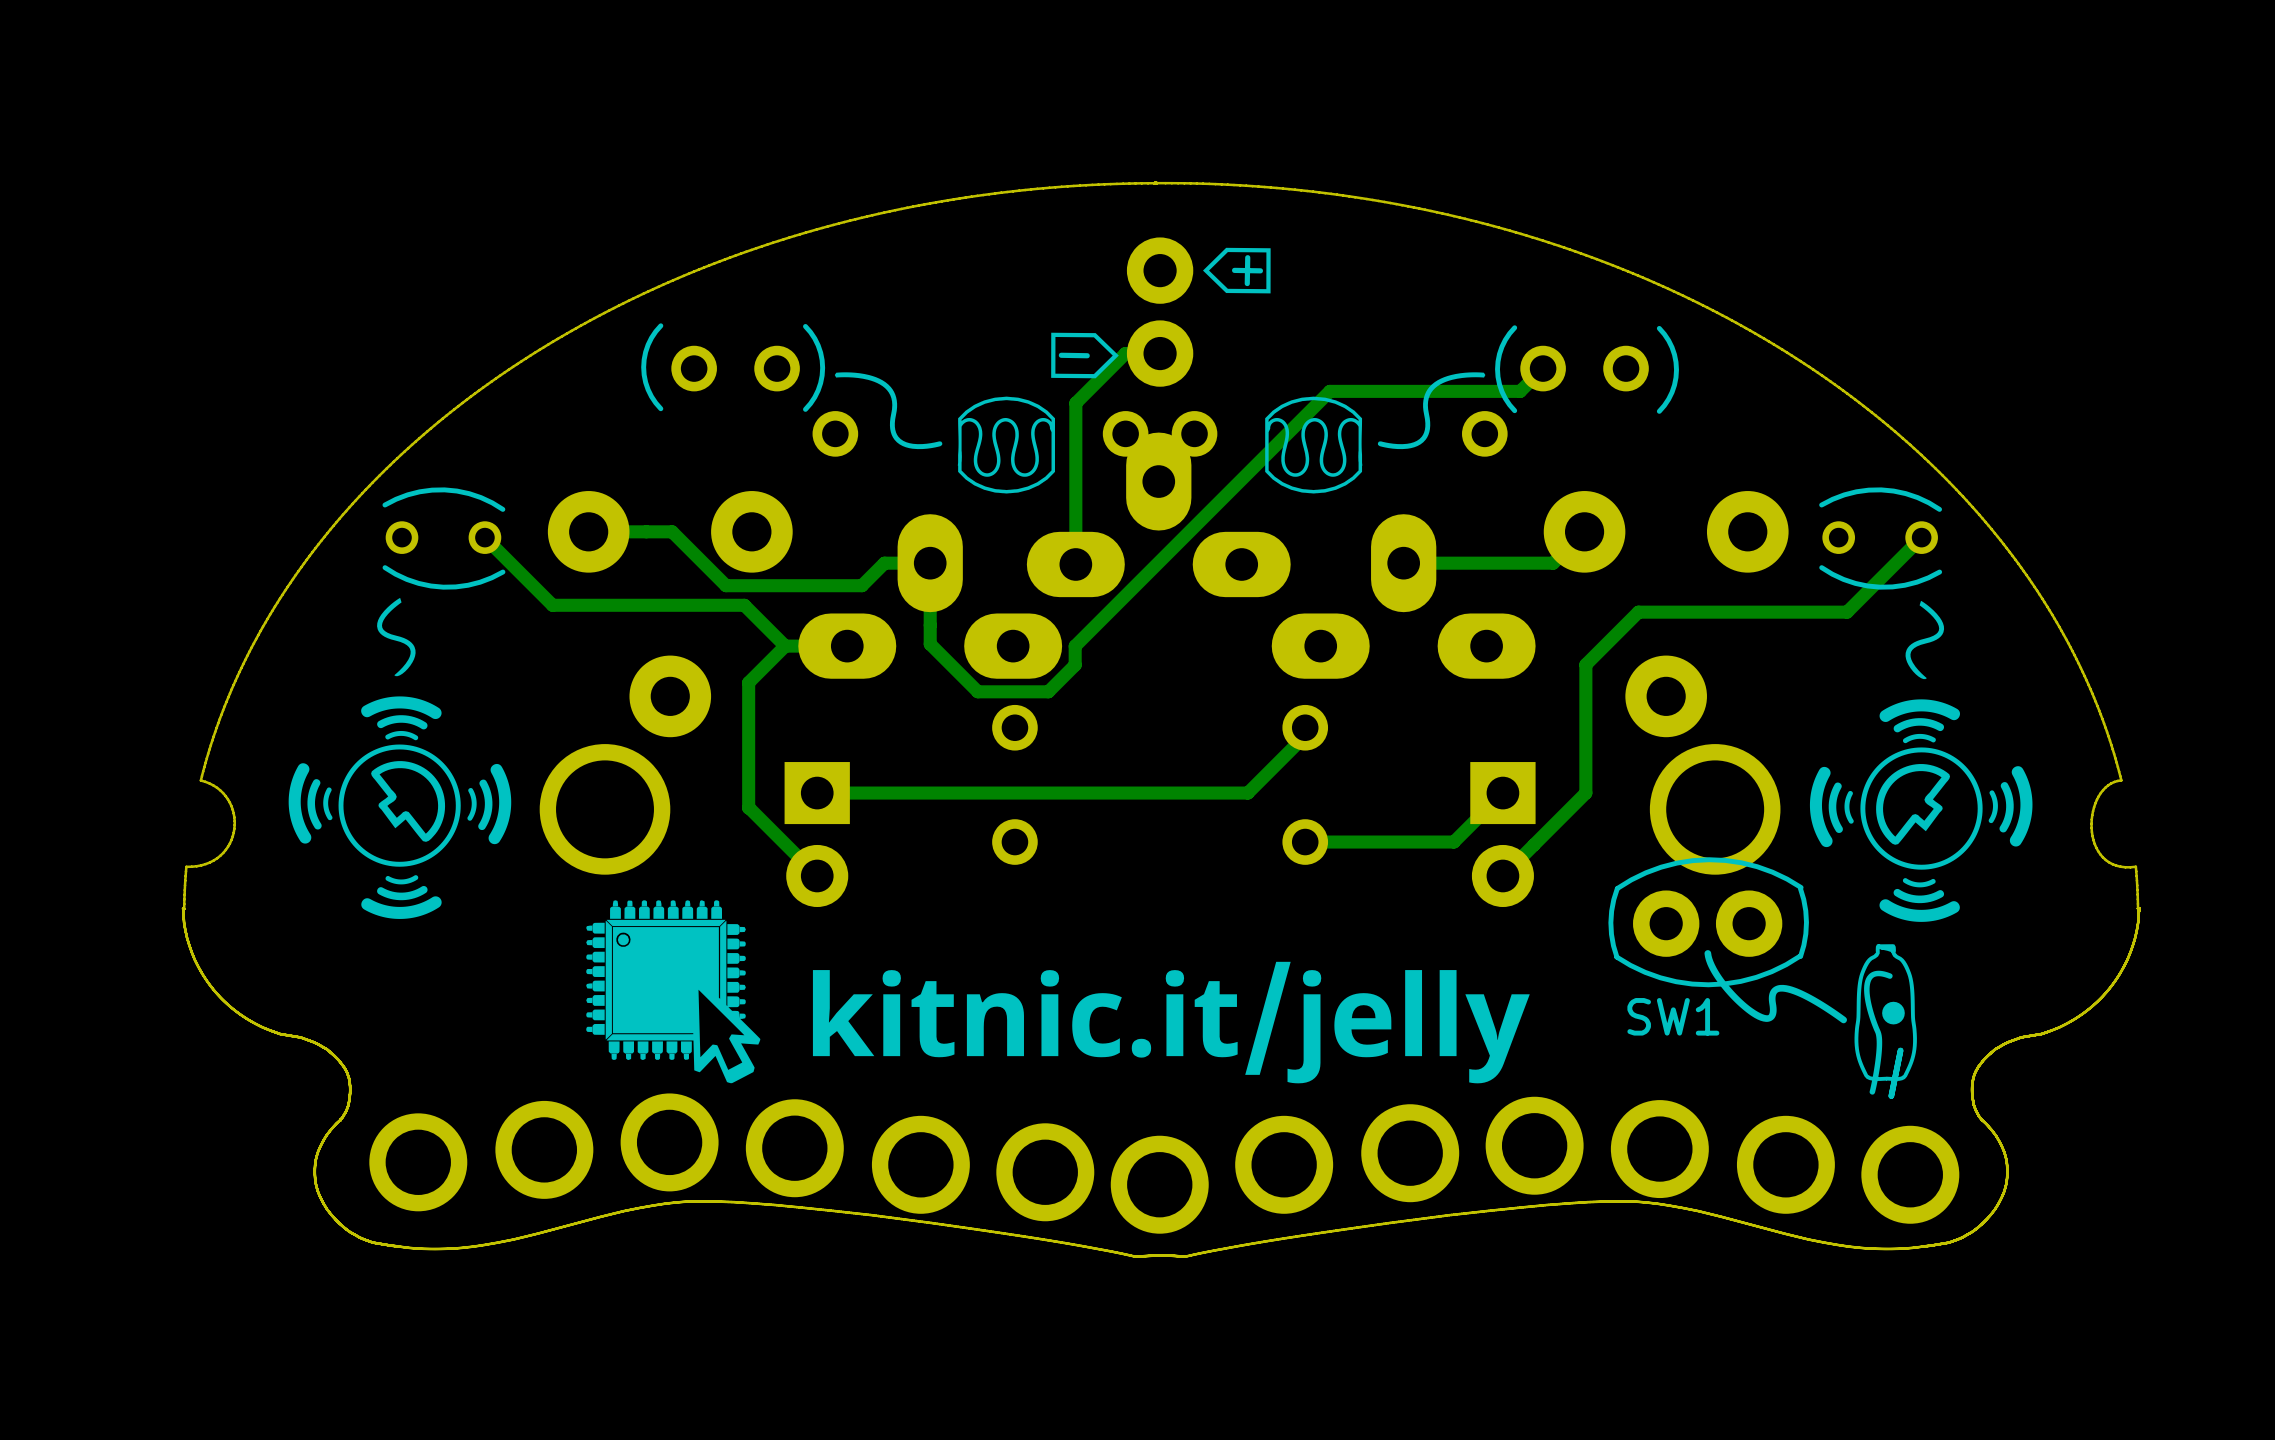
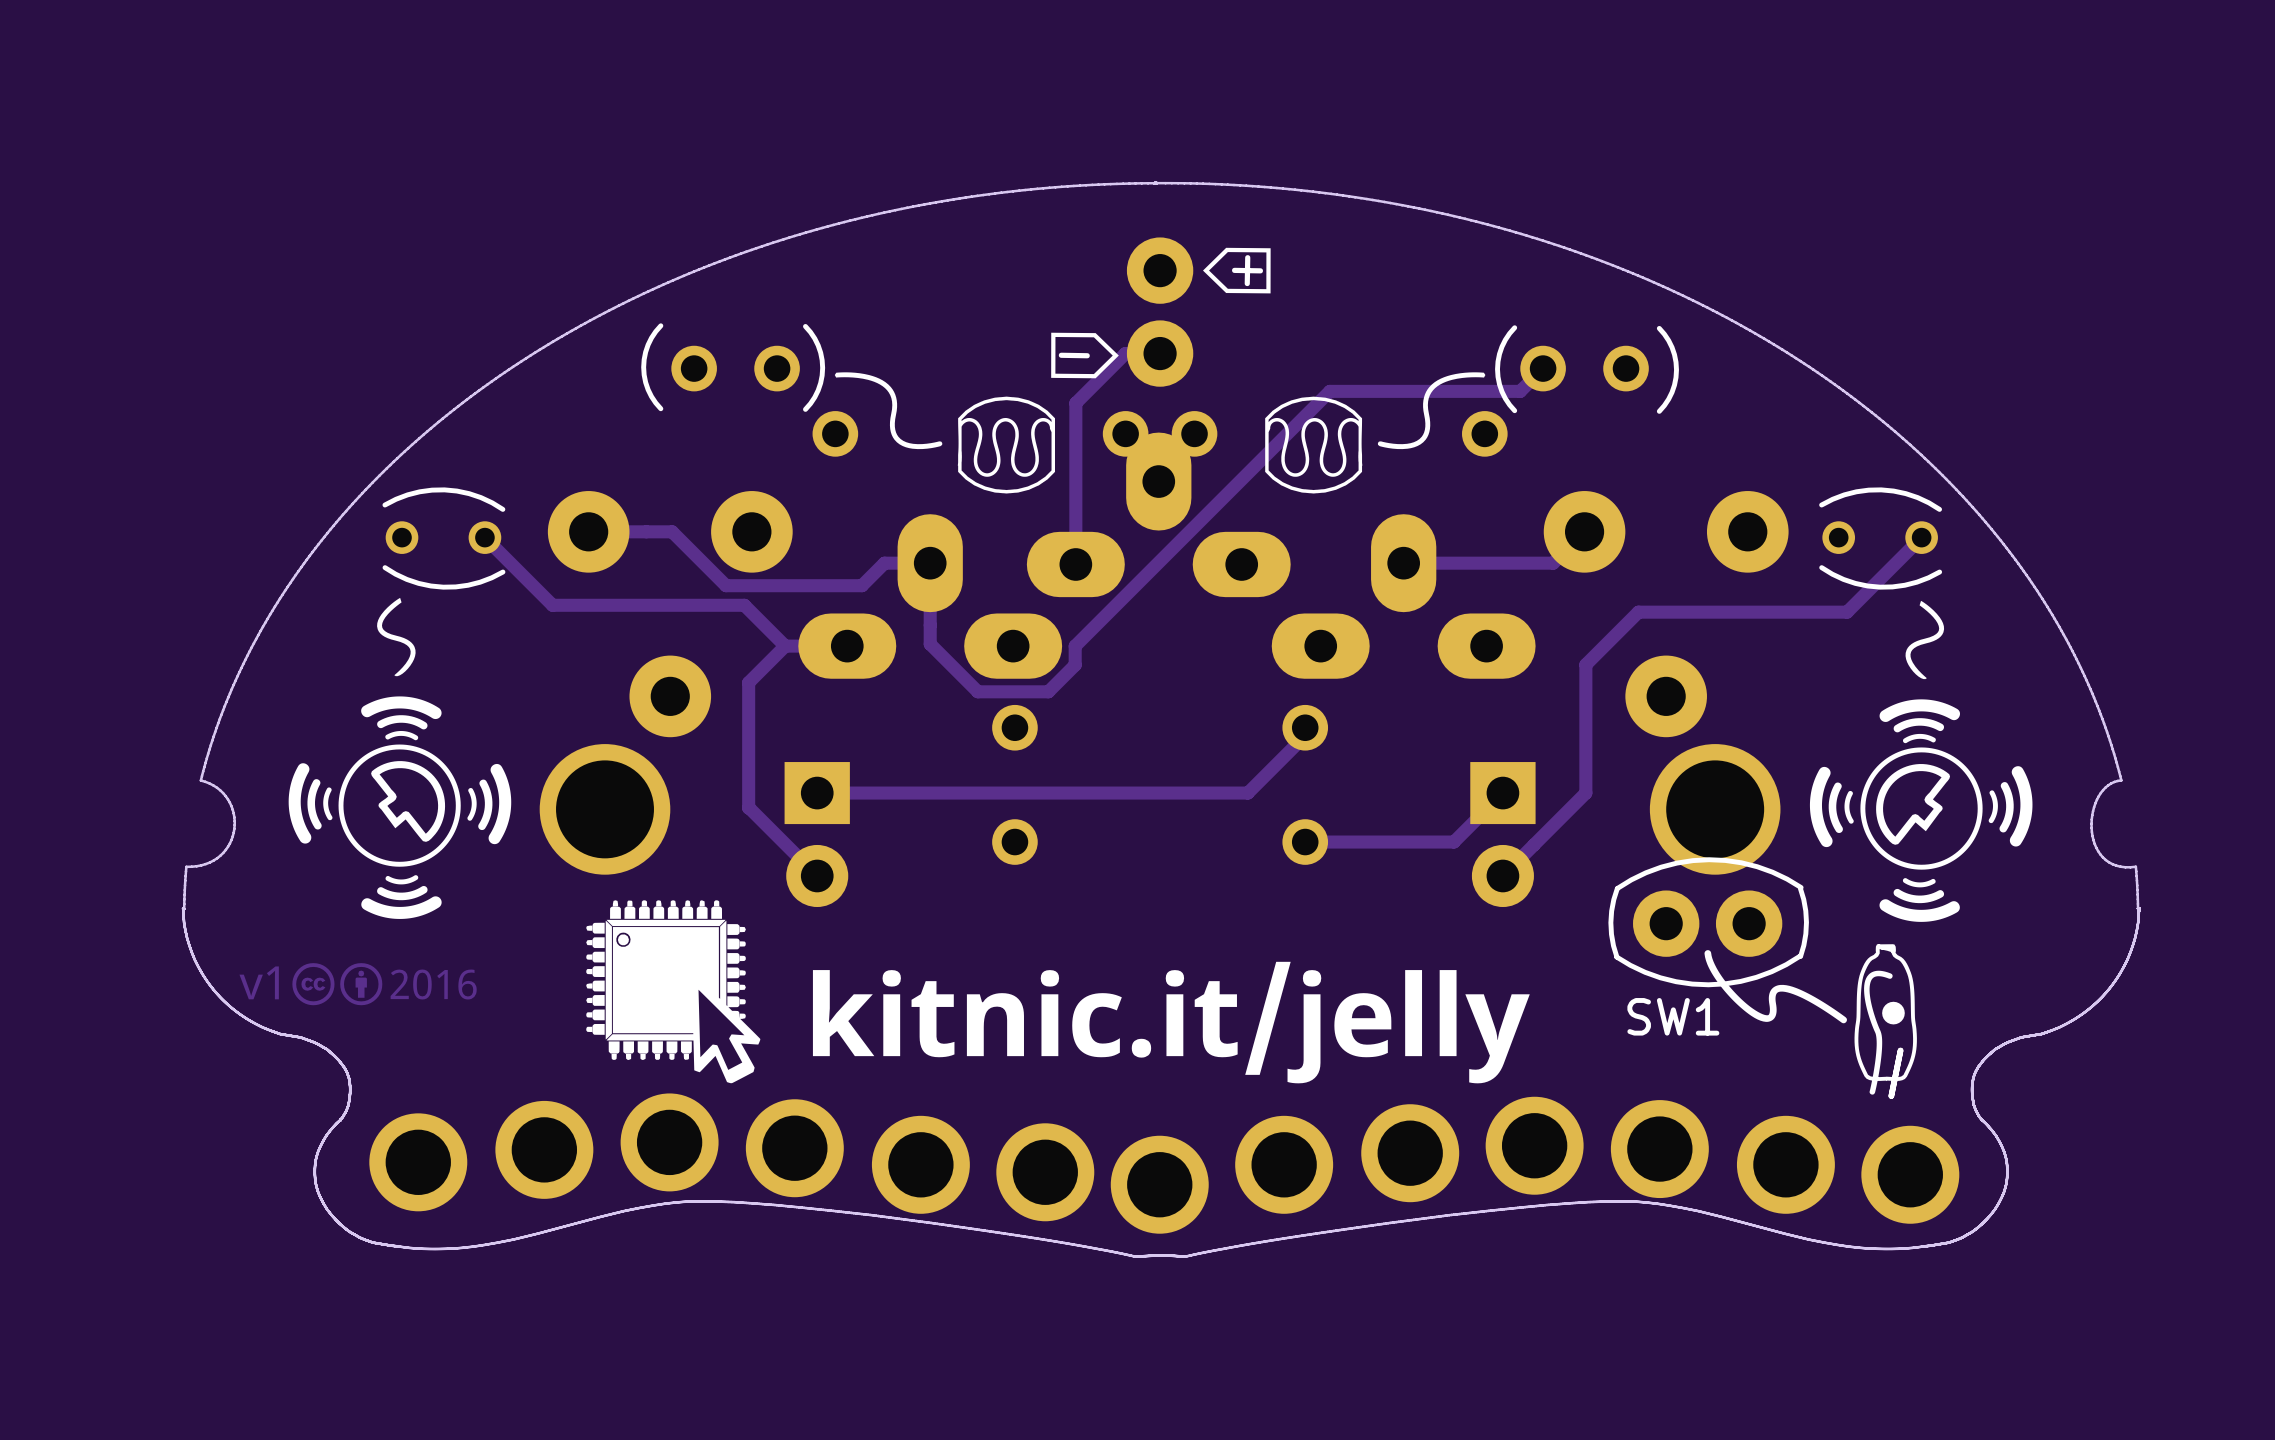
drawing: none -> [239, 963, 477, 1006]

